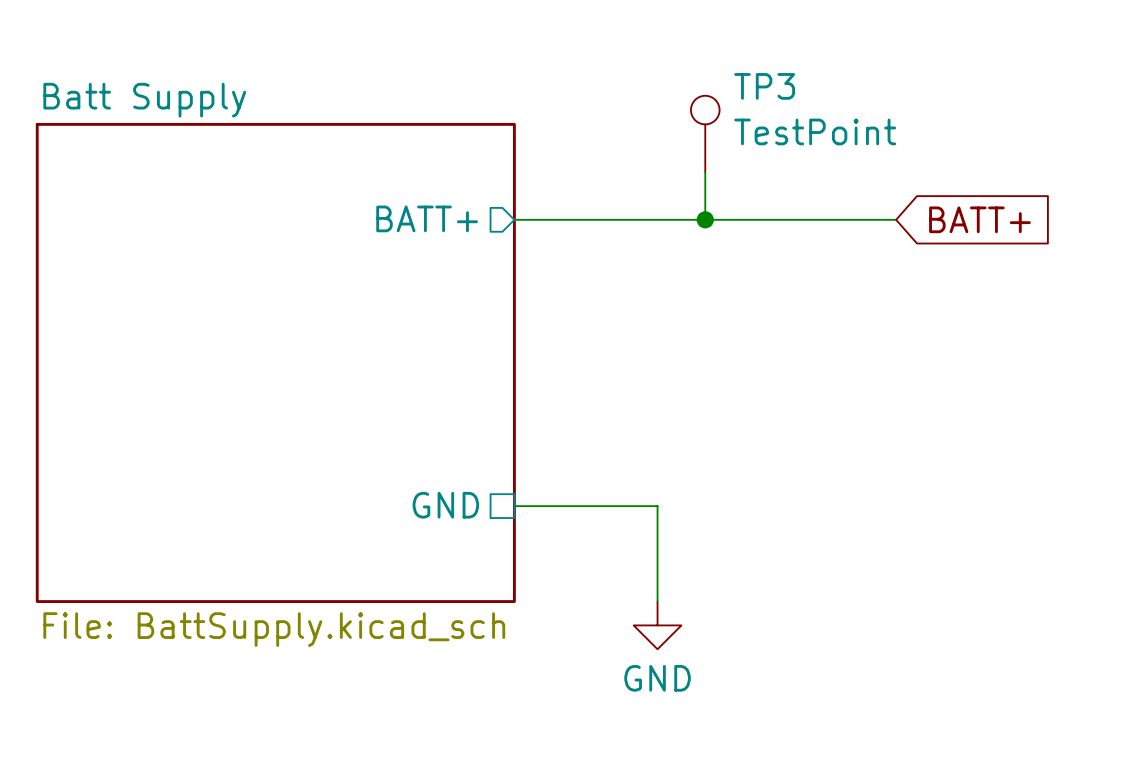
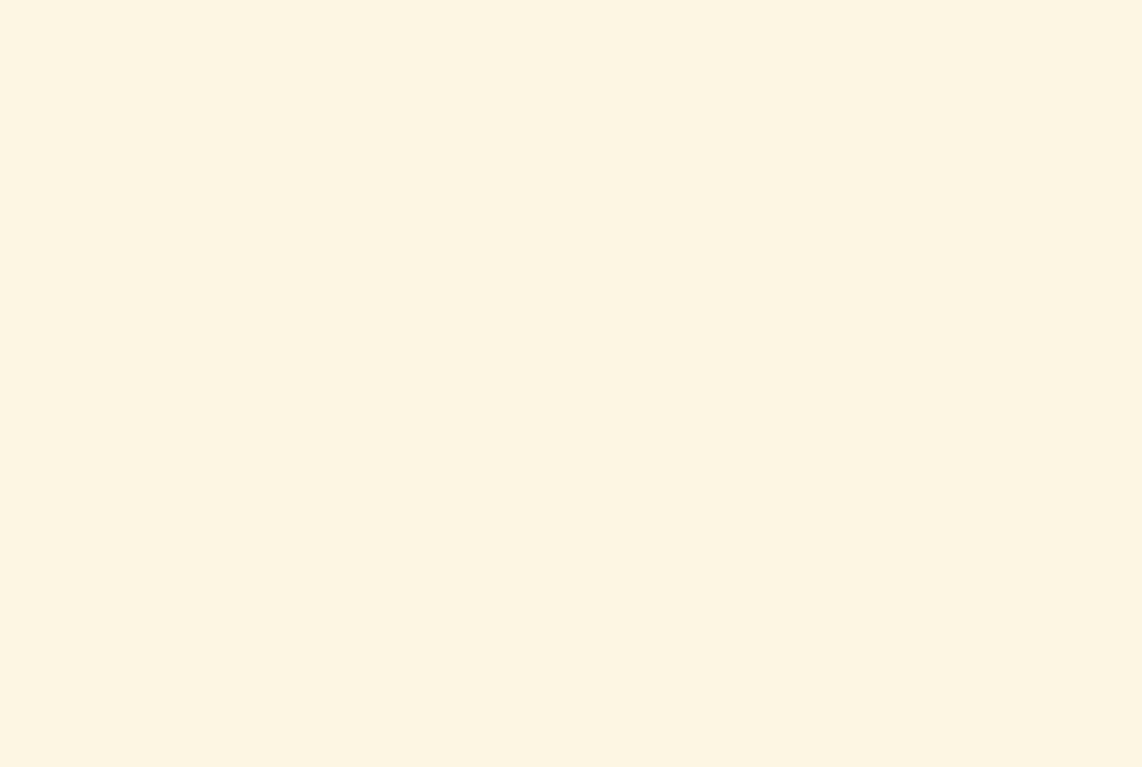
TP3: TestPoint (705, 133) -> none
wire: (705, 172) (705, 219) -> none
sheet pin: BATT+ (427, 218) -> none
wire: (514, 219) (896, 219) -> none
junction: (705, 219) -> none
global label: BATT+ (979, 219) -> none
sheet Batt Supply: File: BattSupply.kicad_sch (275, 362) -> none
sheet pin: GND (445, 505) -> none
wire: (514, 506) (657, 506) (657, 601) -> none
power symbol: GND (657, 625) -> none

